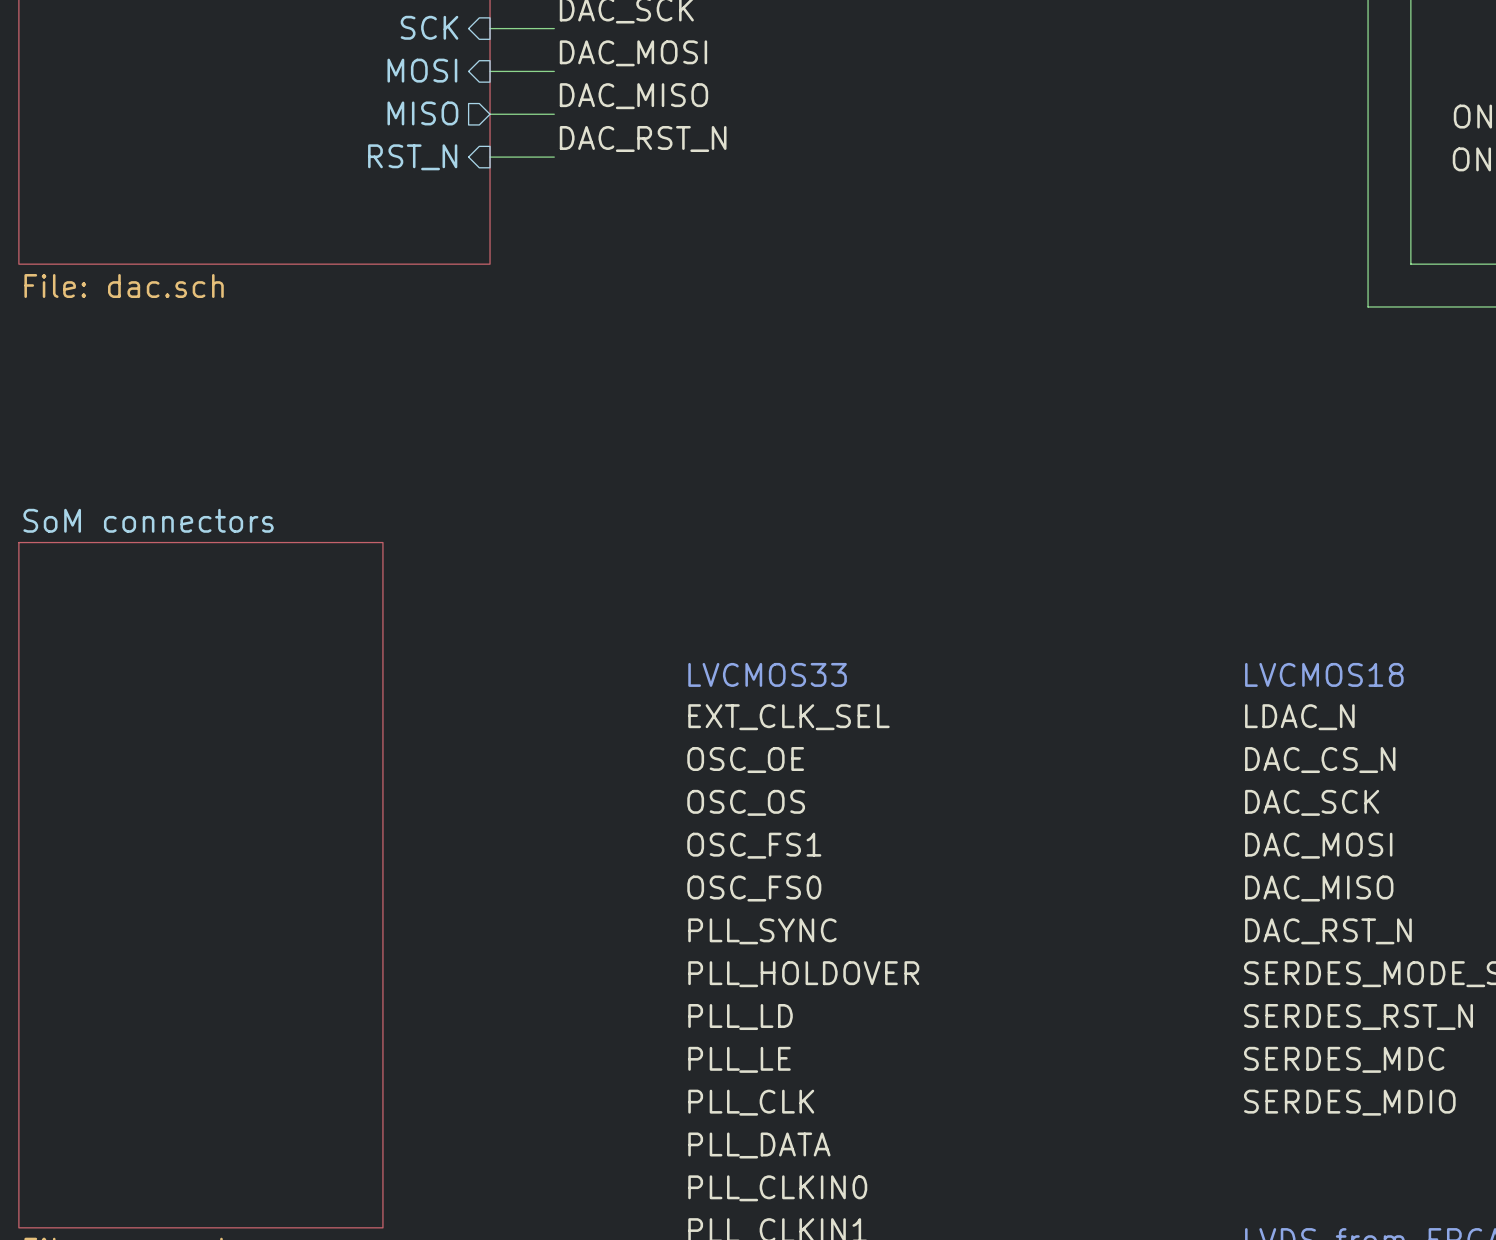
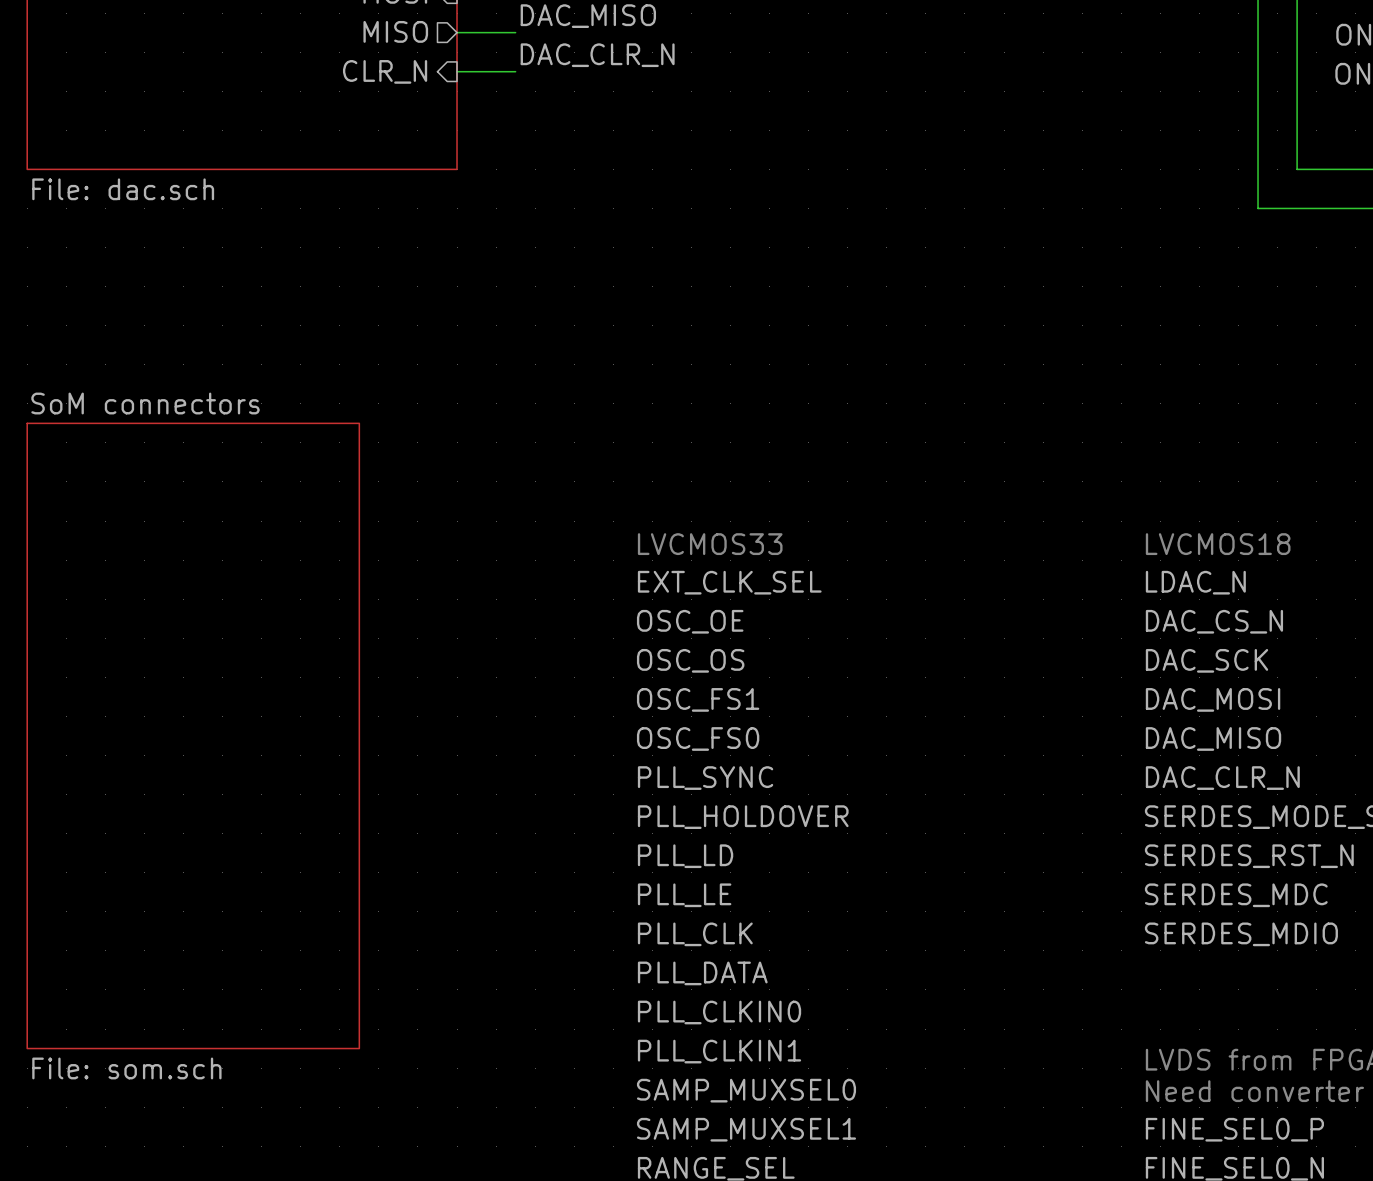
label: DAC_RST_N (643, 138) -> DAC_CLR_N (597, 55)
sheet pin: RST_N (412, 157) -> CLR_N (385, 71)
label: DAC_RST_N (1328, 931) -> DAC_CLR_N (1222, 778)

